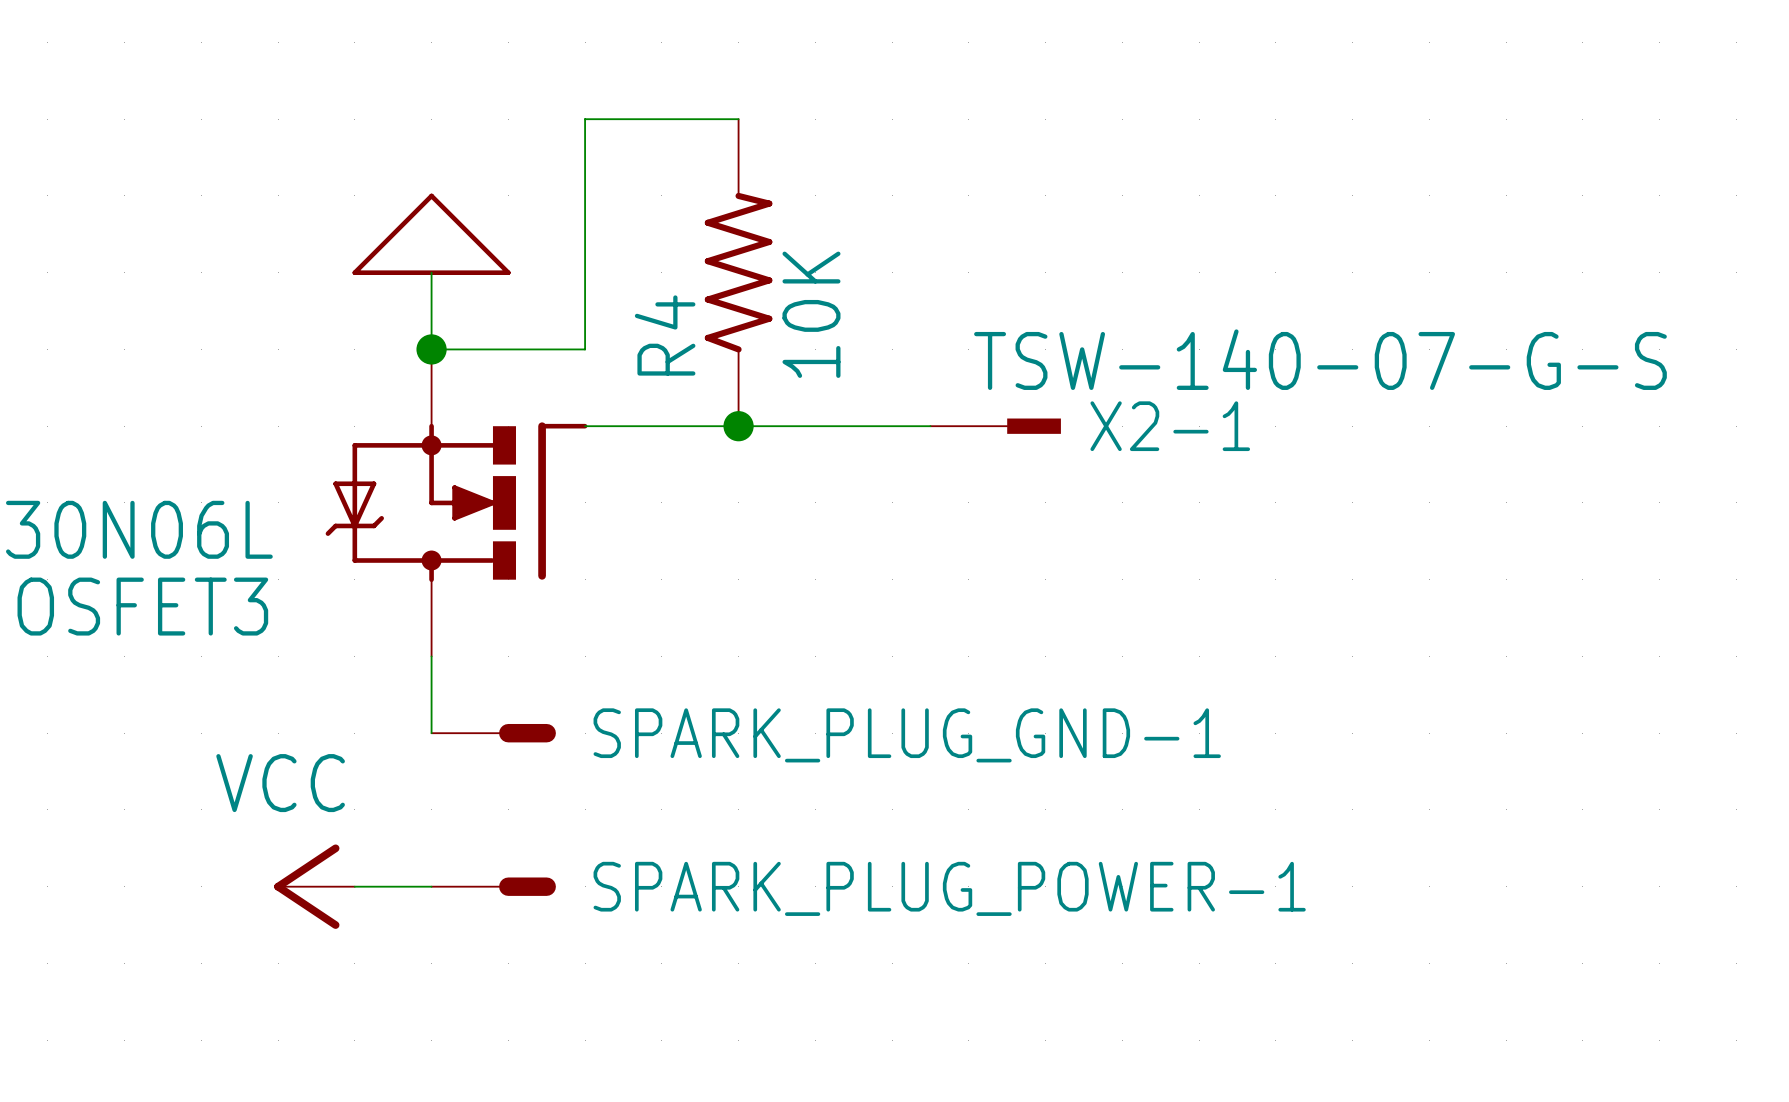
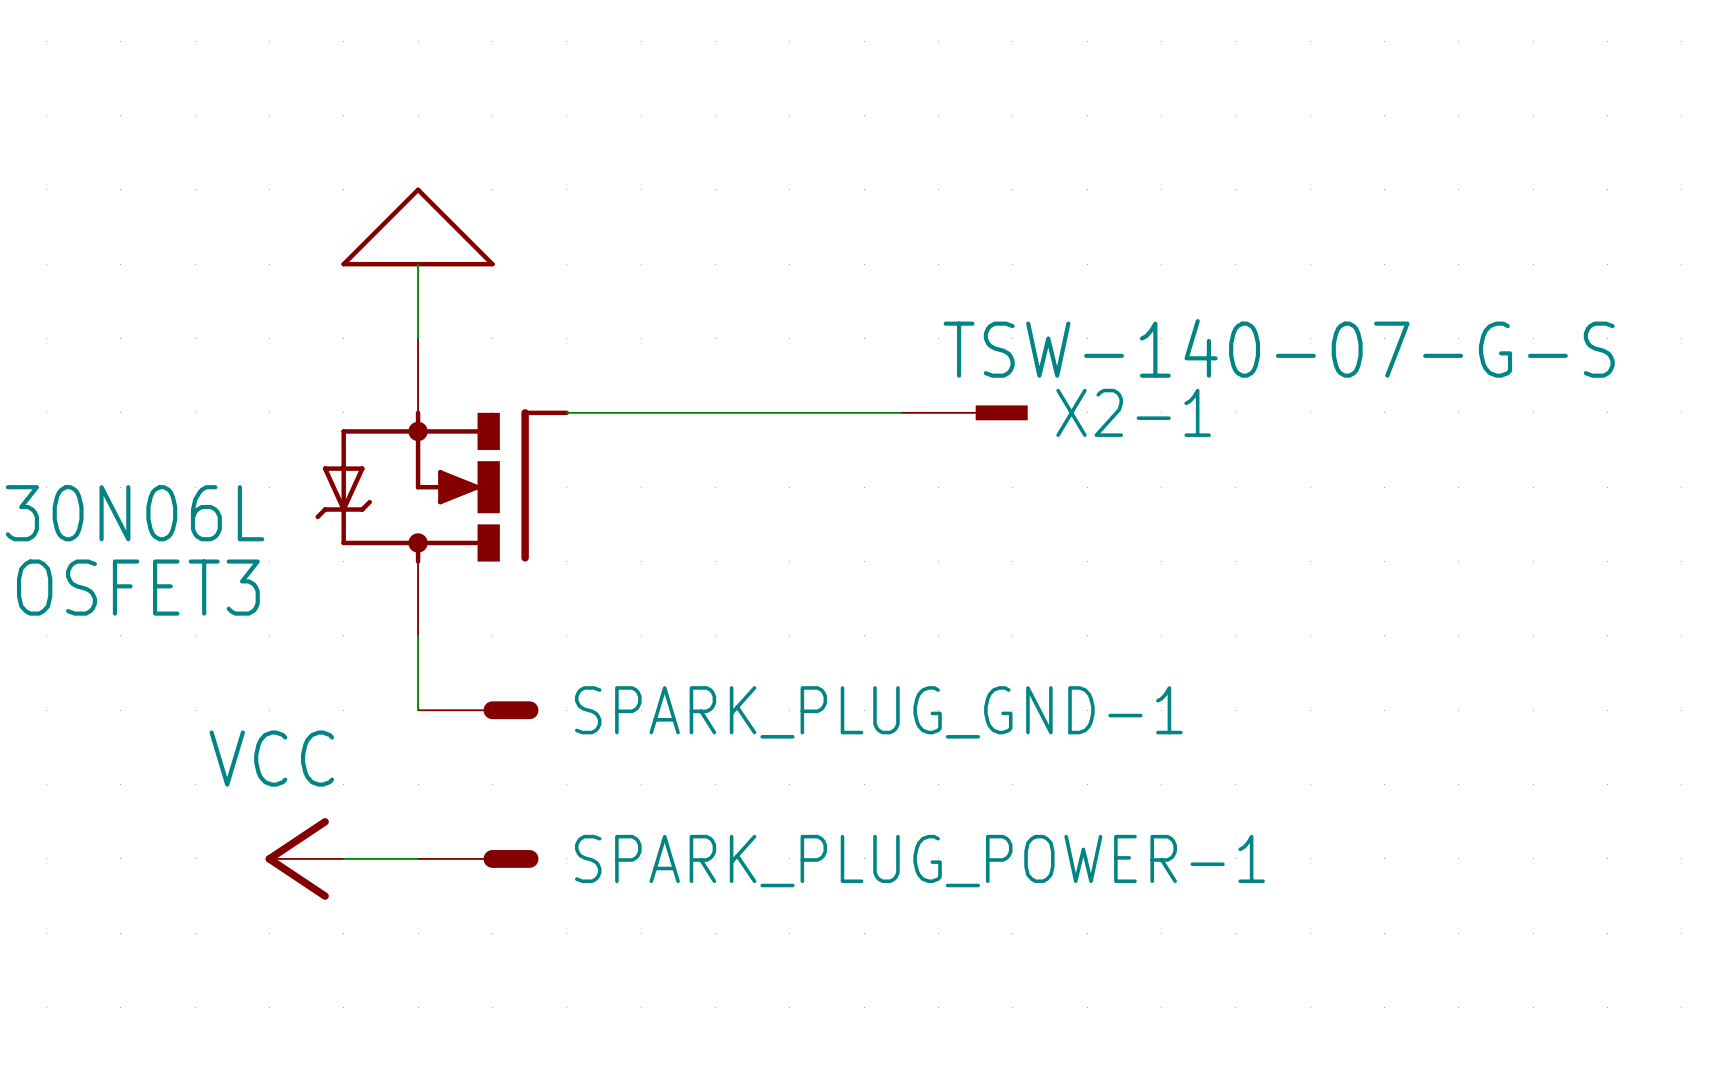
wire: (738, 119) (585, 119) (585, 349) (431, 349) -> none
R4: 10K (738, 272) -> none
junction: (431, 349) -> none
junction: (738, 426) -> none

